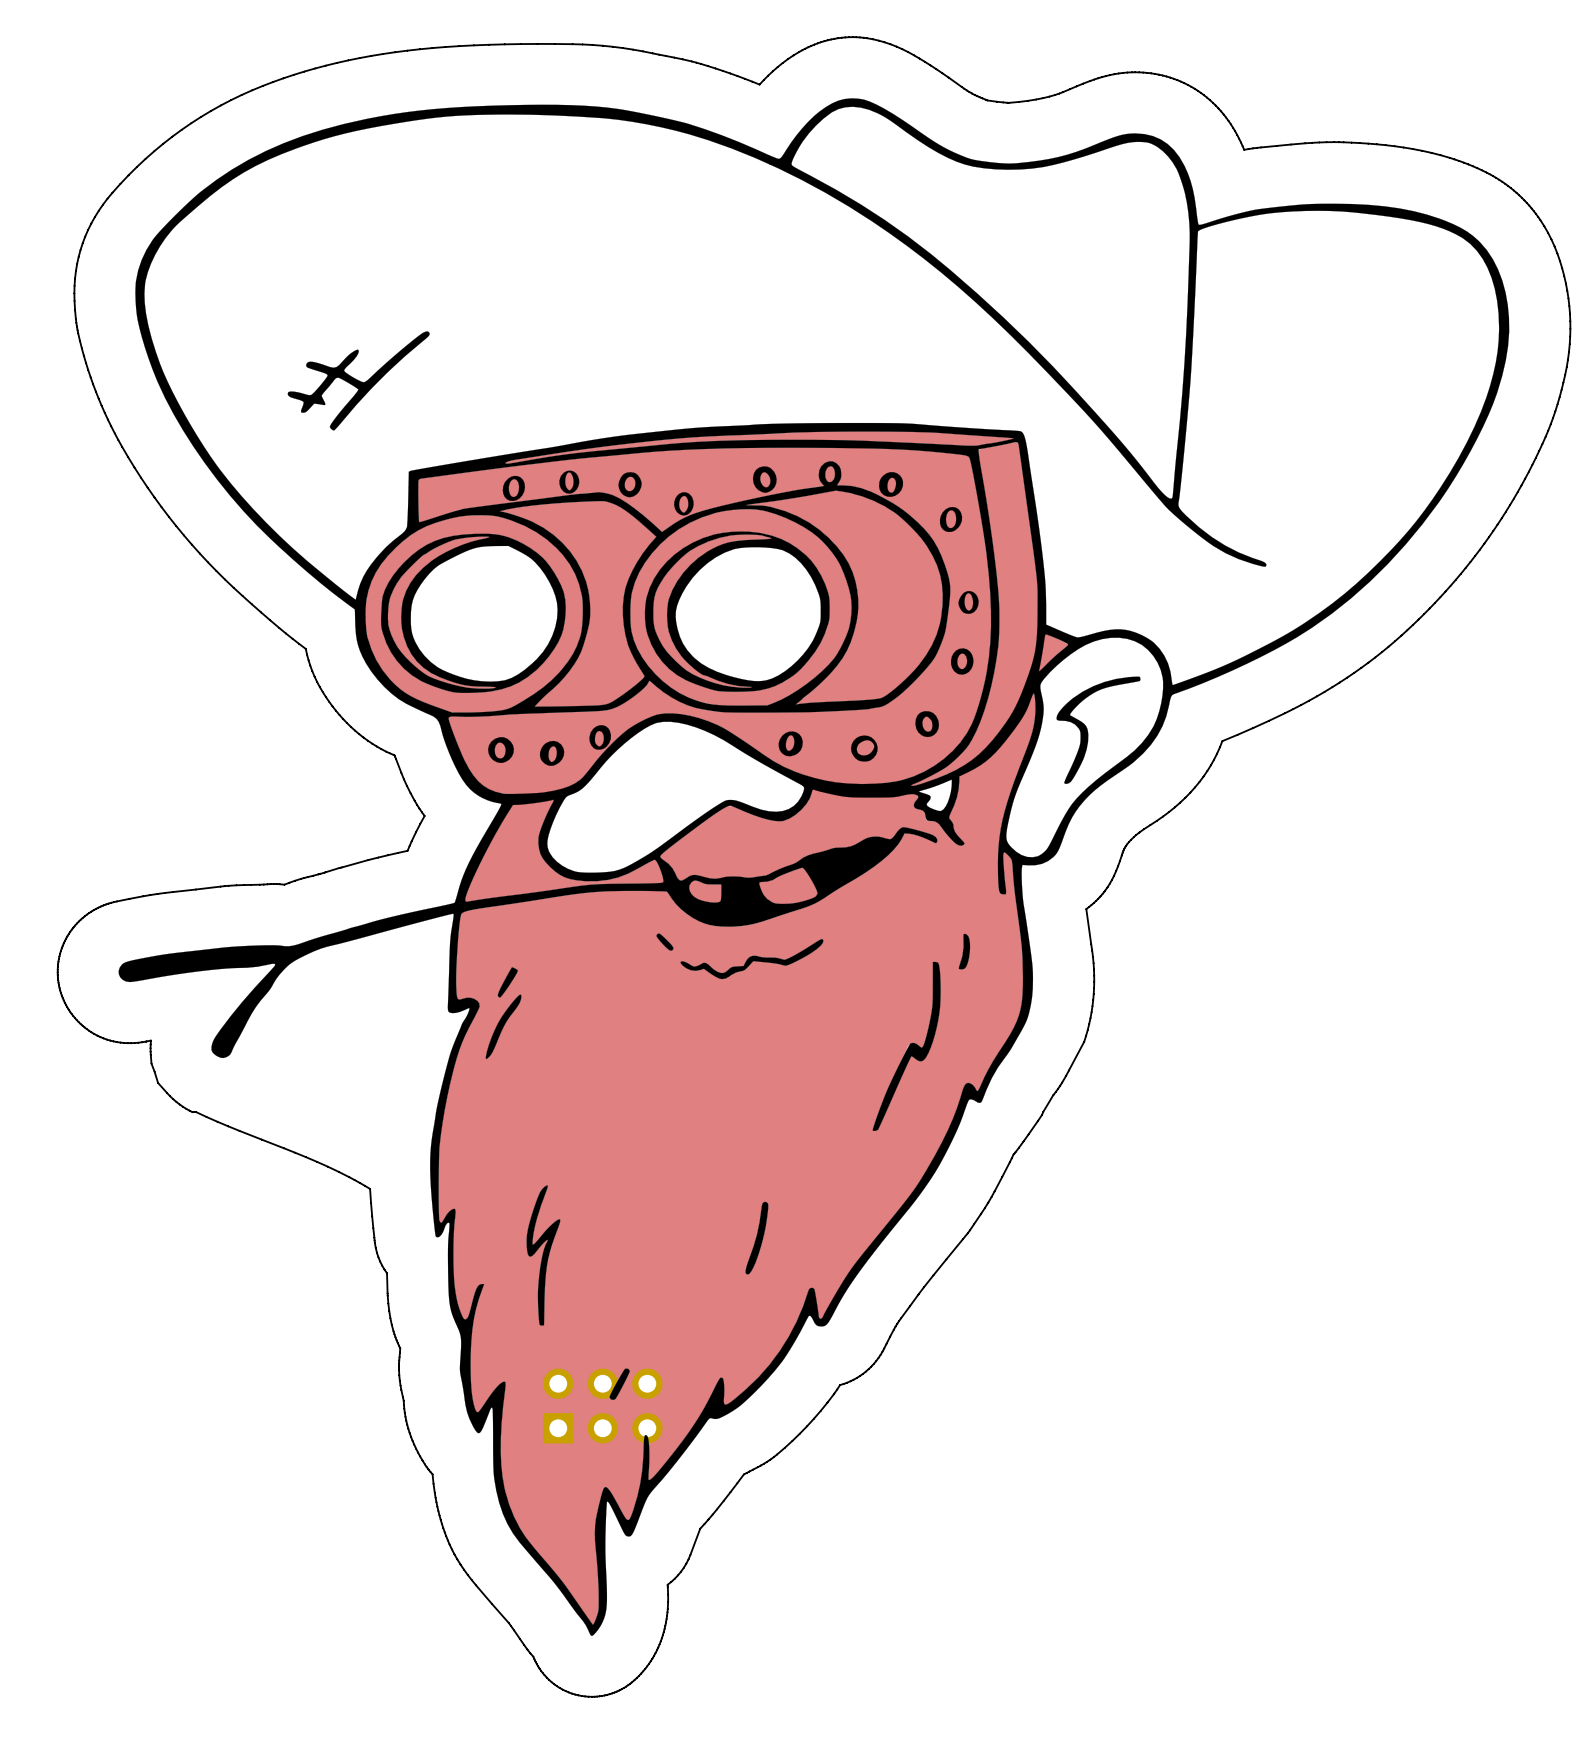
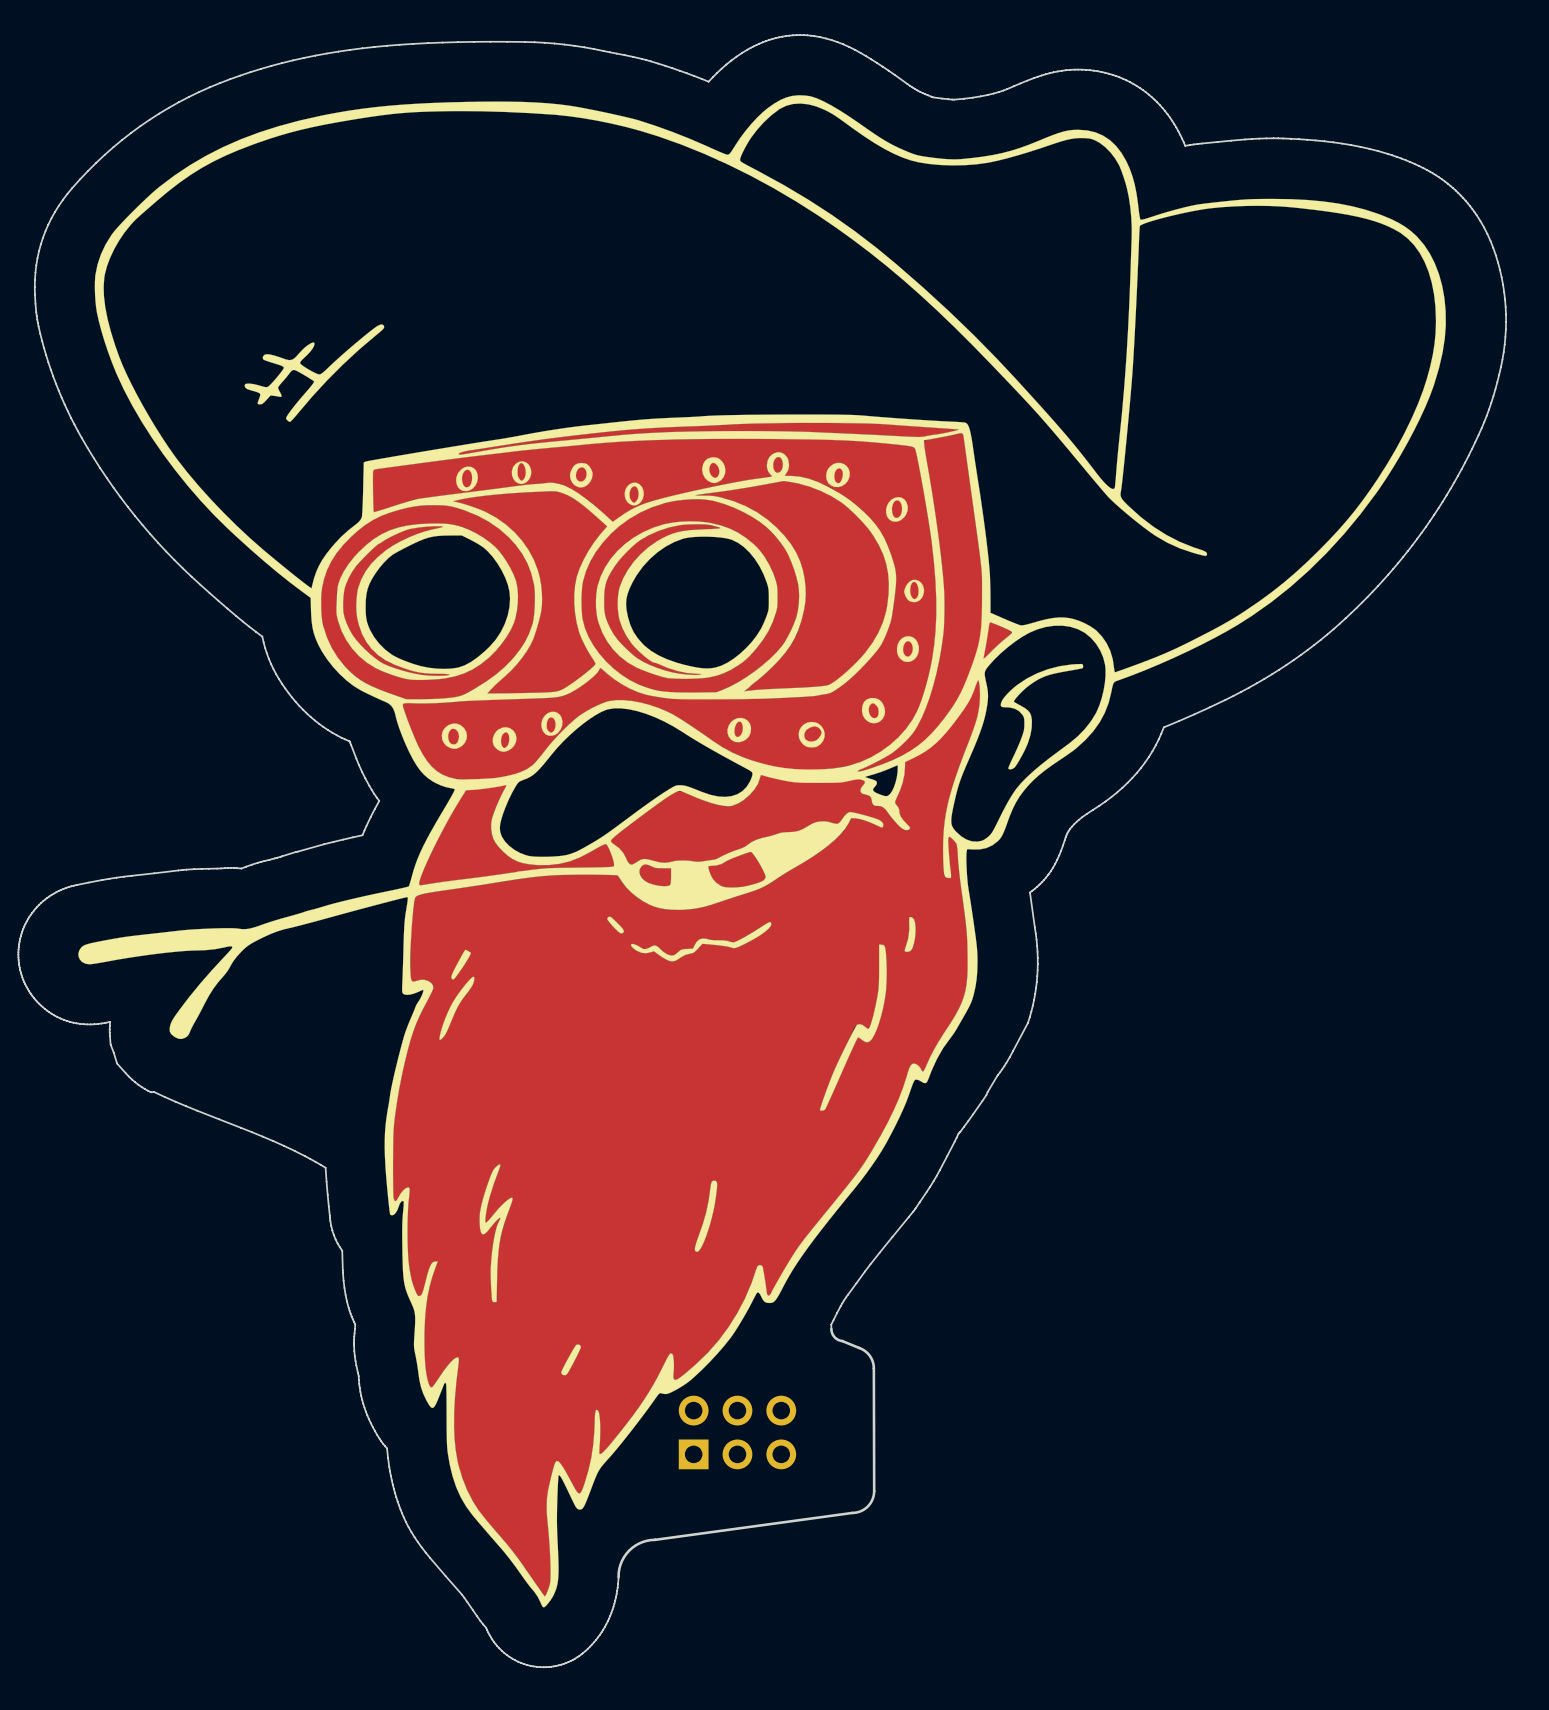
board edge: (884, 1348) (876, 1361) (865, 1371) (853, 1379) (840, 1385) (814, 1418) (784, 1447) (767, 1461) (743, 1474) (700, 1528) (686, 1563) (678, 1575) (667, 1584) (667, 1612) -> (831, 1324) (832, 1333) (835, 1338) (863, 1350) (873, 1363) (874, 1491) (869, 1504) (861, 1510) (854, 1512) (642, 1541) (632, 1548) (623, 1557) (619, 1568) (618, 1584)
part position: (602, 1406) -> (737, 1432)

